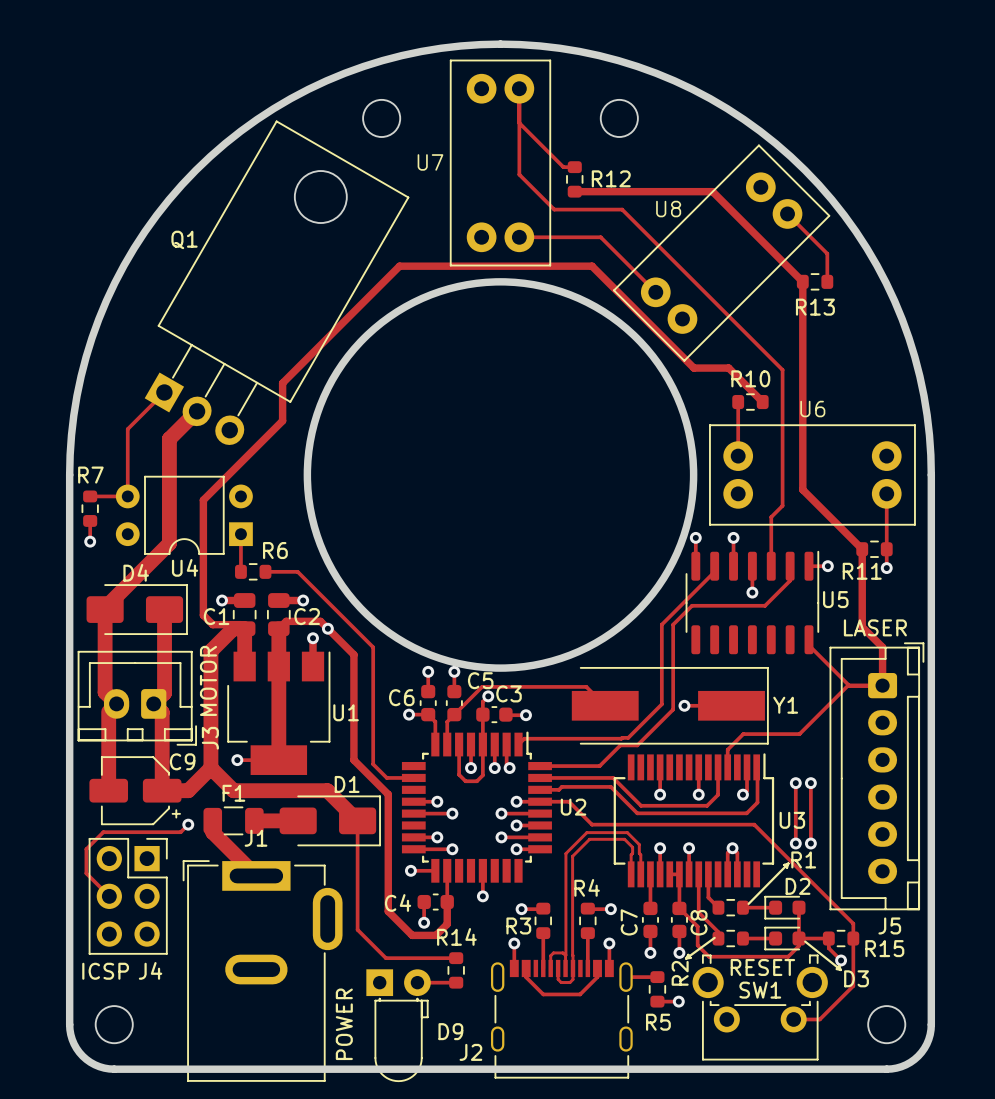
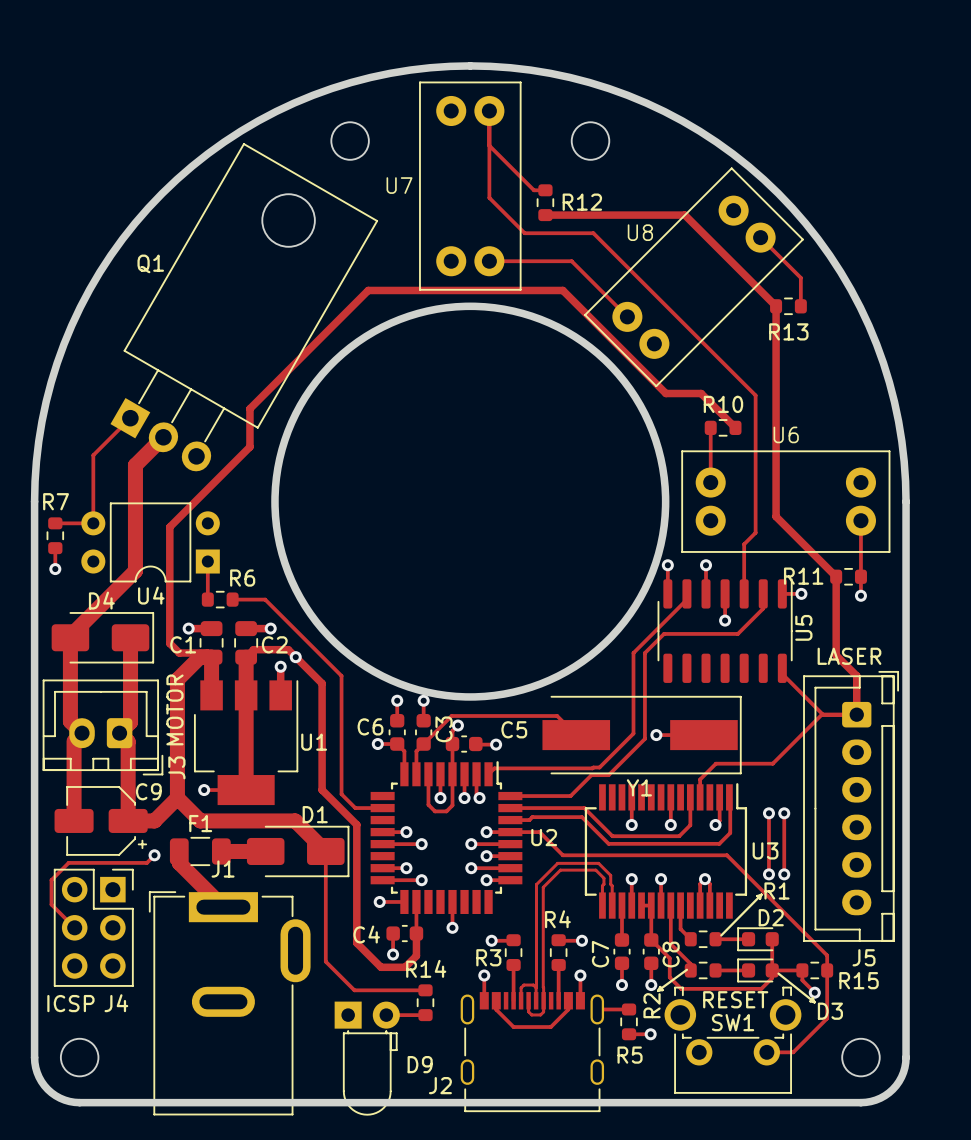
R11 name position: R11 (862, 571) -> R11 (803, 576)
U5 name rotation: 0° (835, 599) -> 90° counterclockwise (803, 627)
C5 name position: C5 (480, 680) -> C5 (514, 729)
C3 name rotation: 0° (509, 693) -> 90° counterclockwise (444, 729)
Y1 name position: Y1 (785, 705) -> Y1 (639, 787)
J1 text: POWER (344, 1024) -> none

